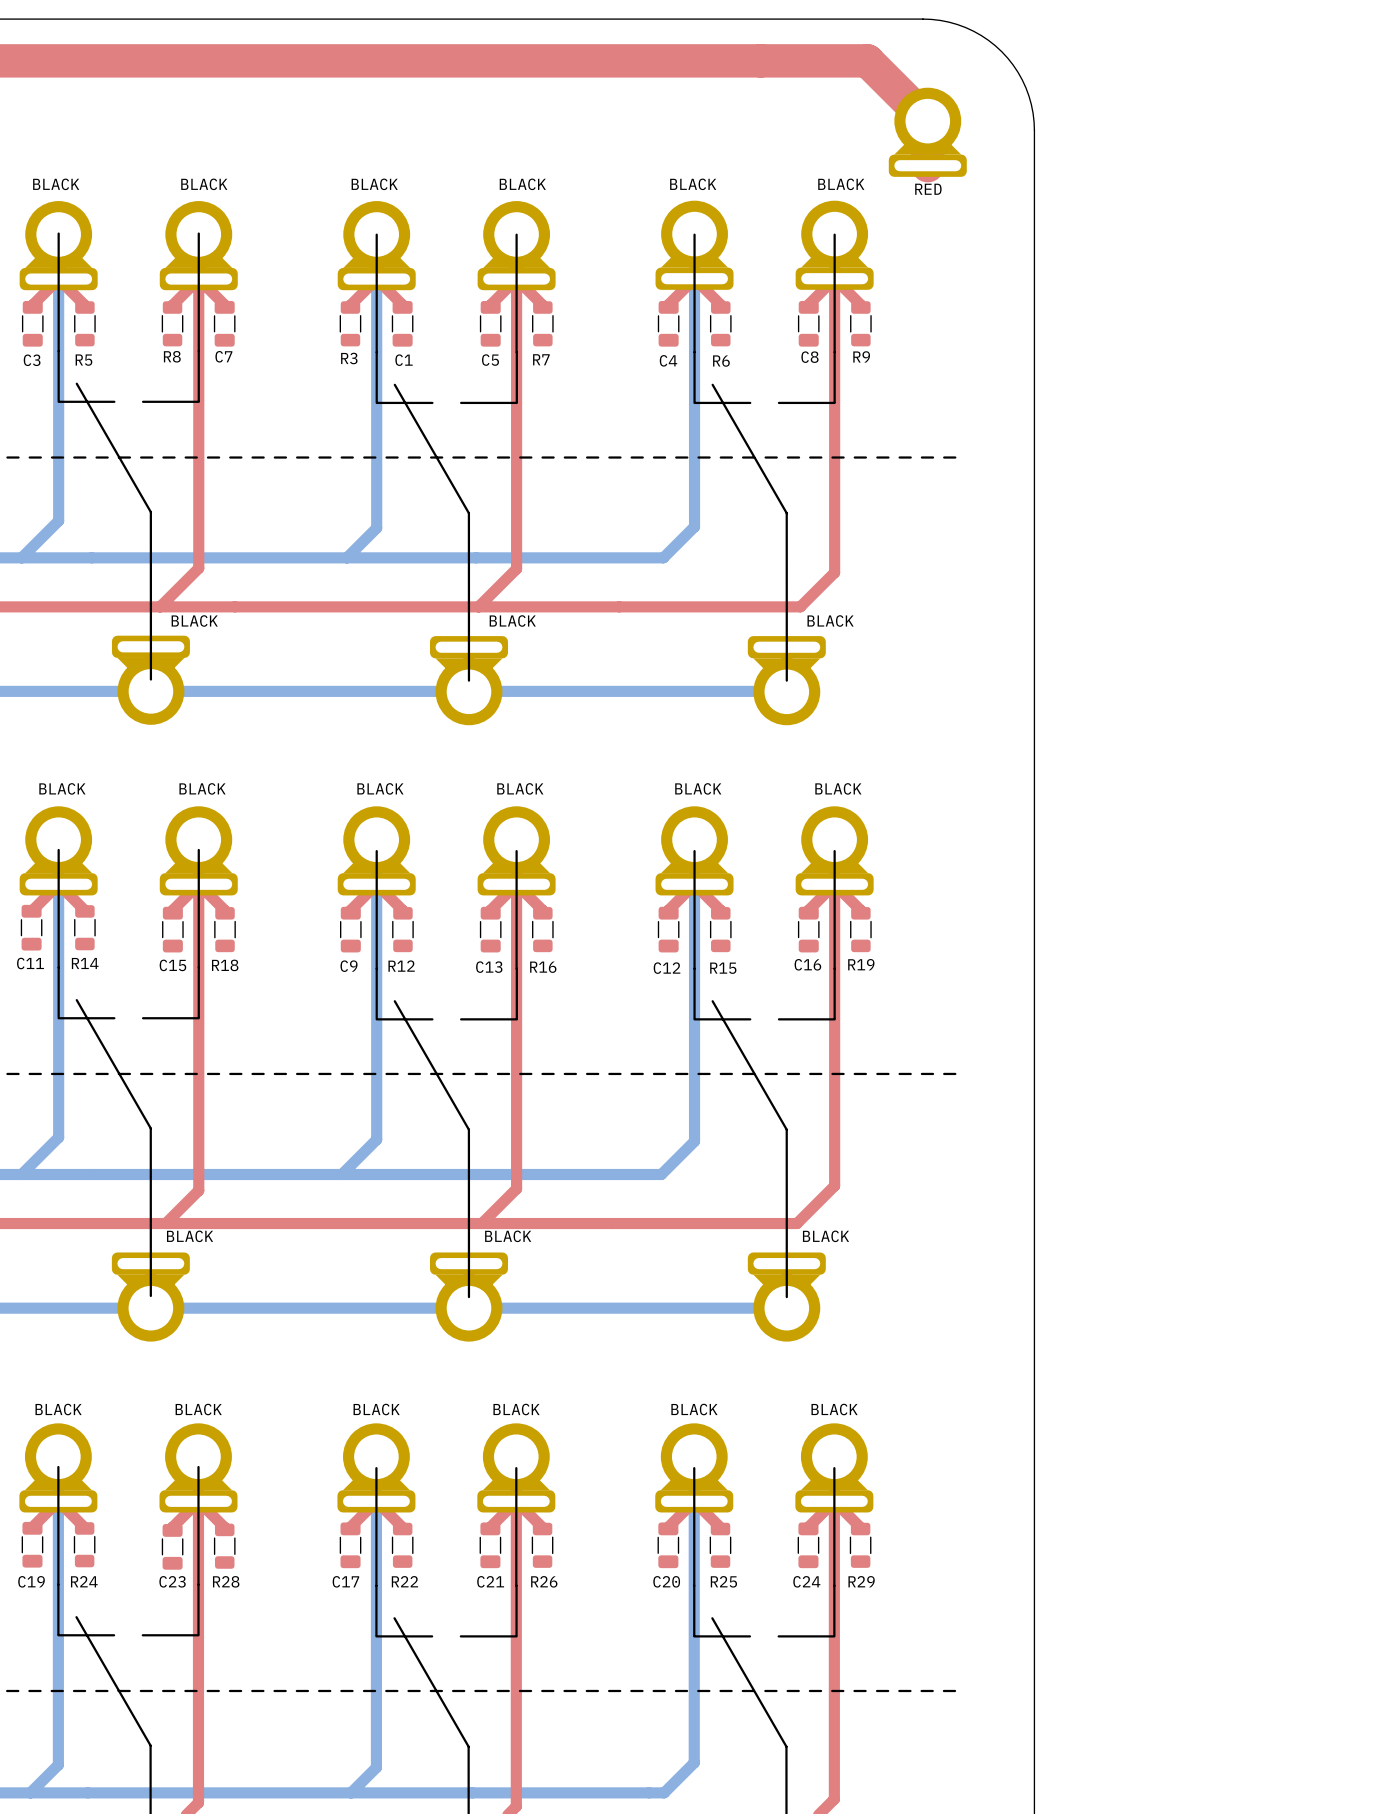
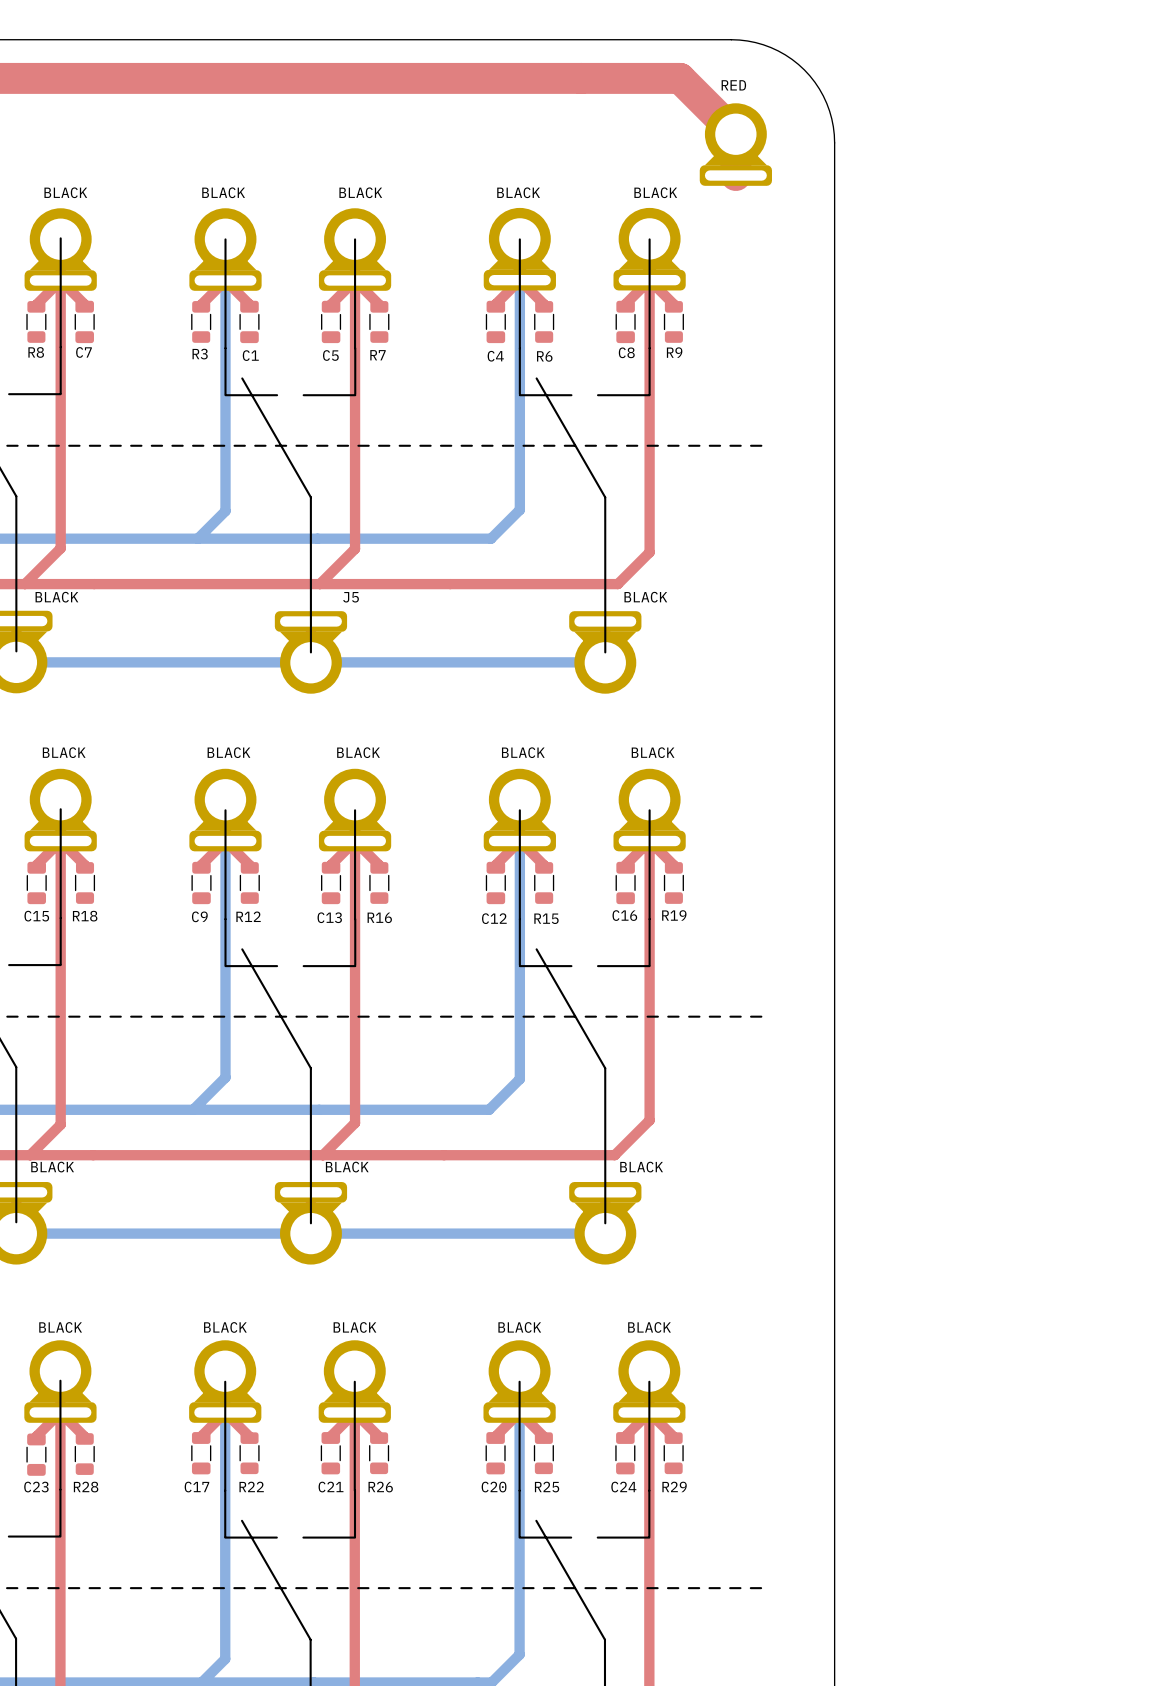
RED name position: RED (928, 189) -> RED (733, 85)
BLACK name: BLACK (512, 621) -> J5 (351, 597)

